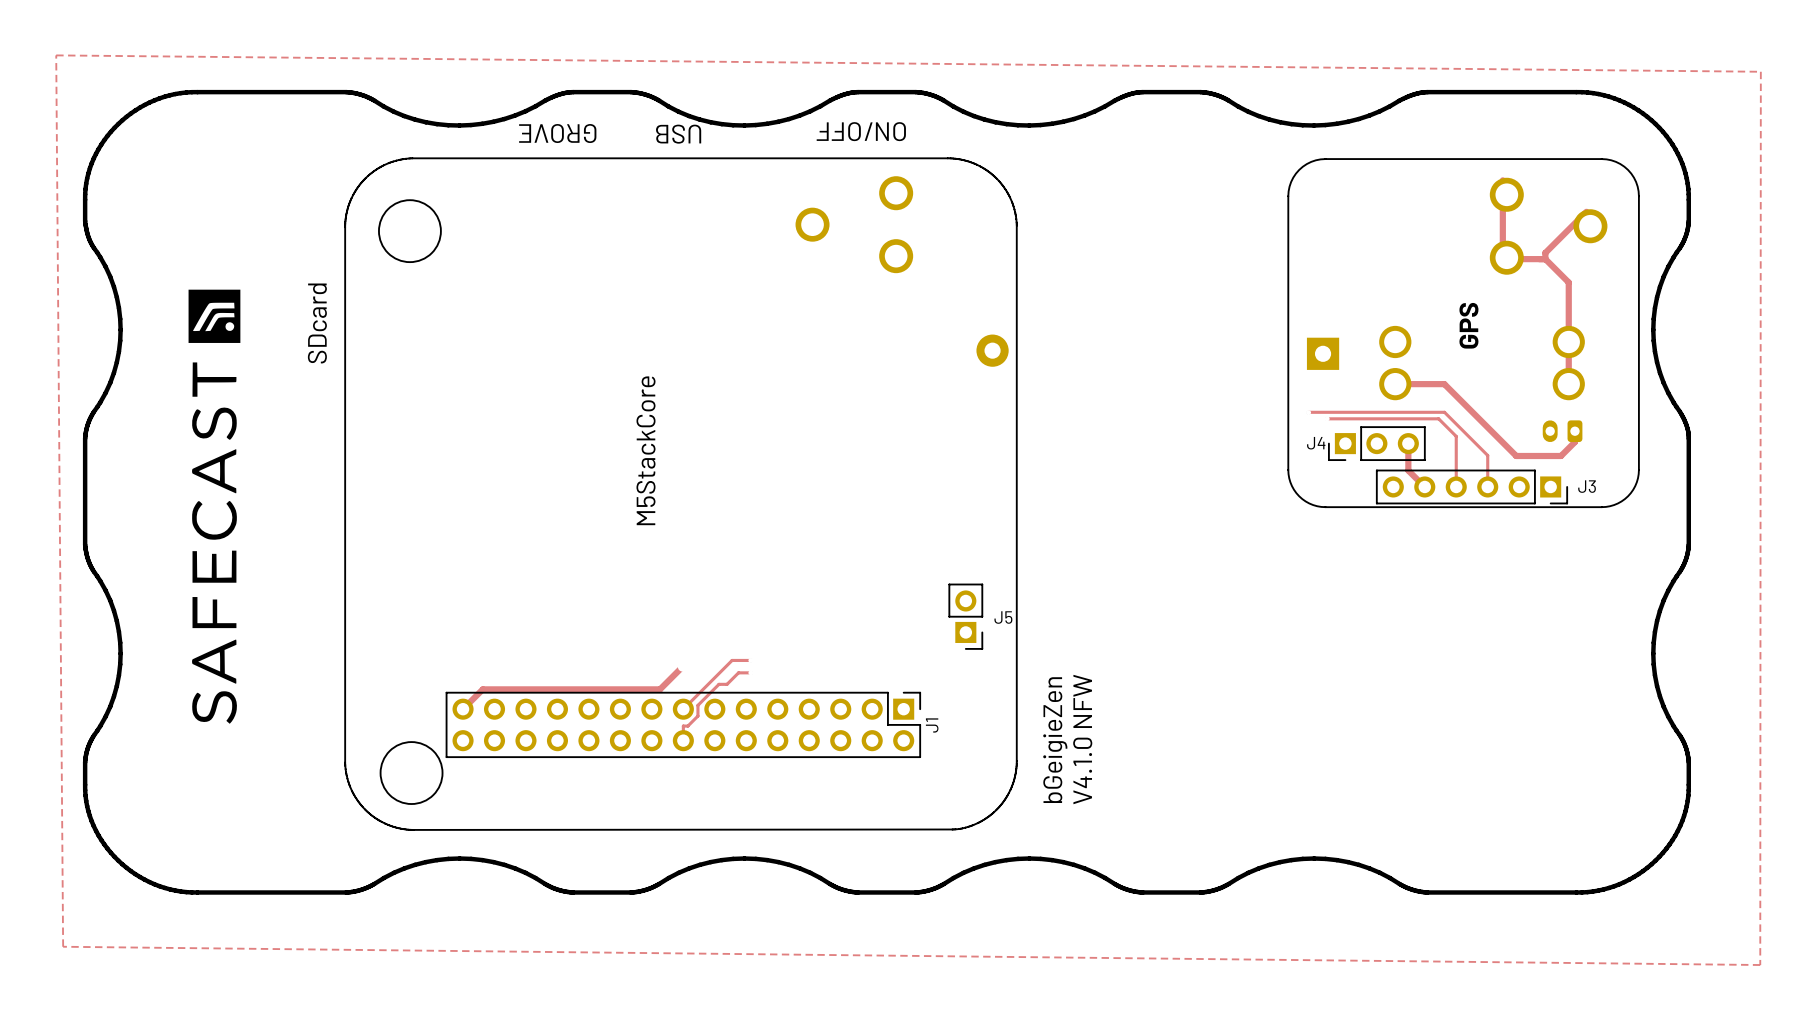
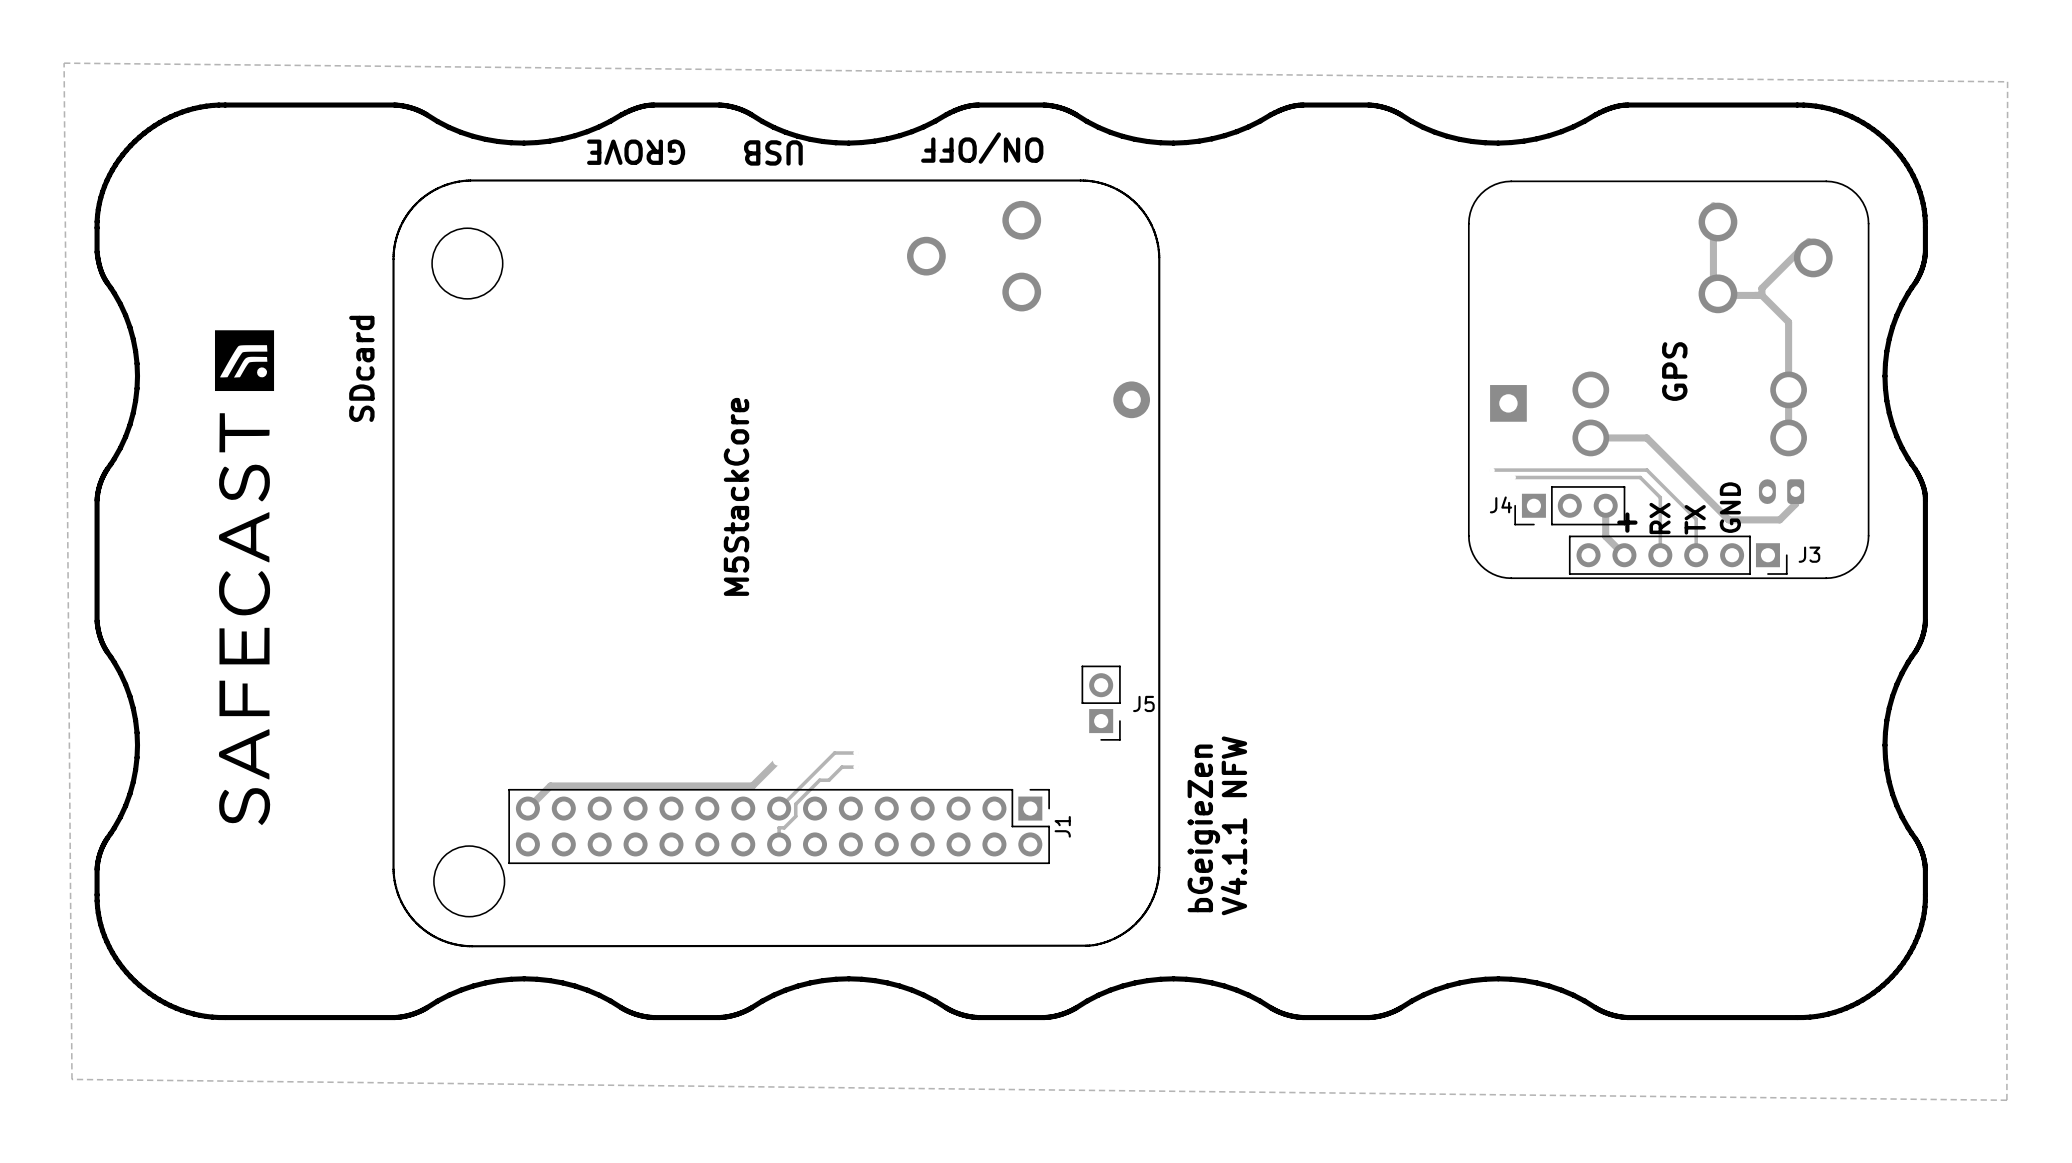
text: none -> GND (1730, 507)
text: none -> + (1627, 522)
text: none -> TX (1695, 519)
text: none -> RX (1660, 518)
text: V4.1.0 NFW (1082, 739) -> V4.1.1 NFW (1233, 825)

